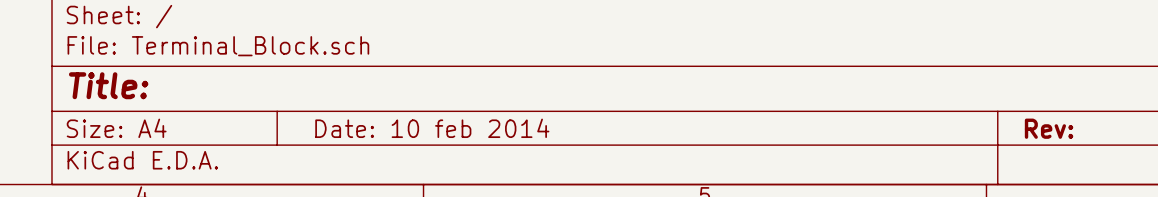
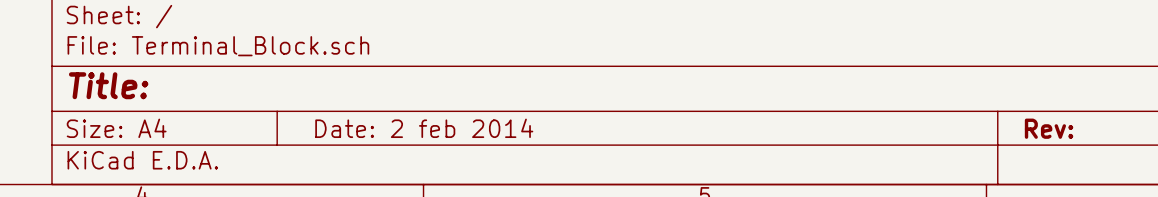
title block: Date: 10 feb 2014 (432, 128) -> Date: 2 feb 2014 (424, 128)

